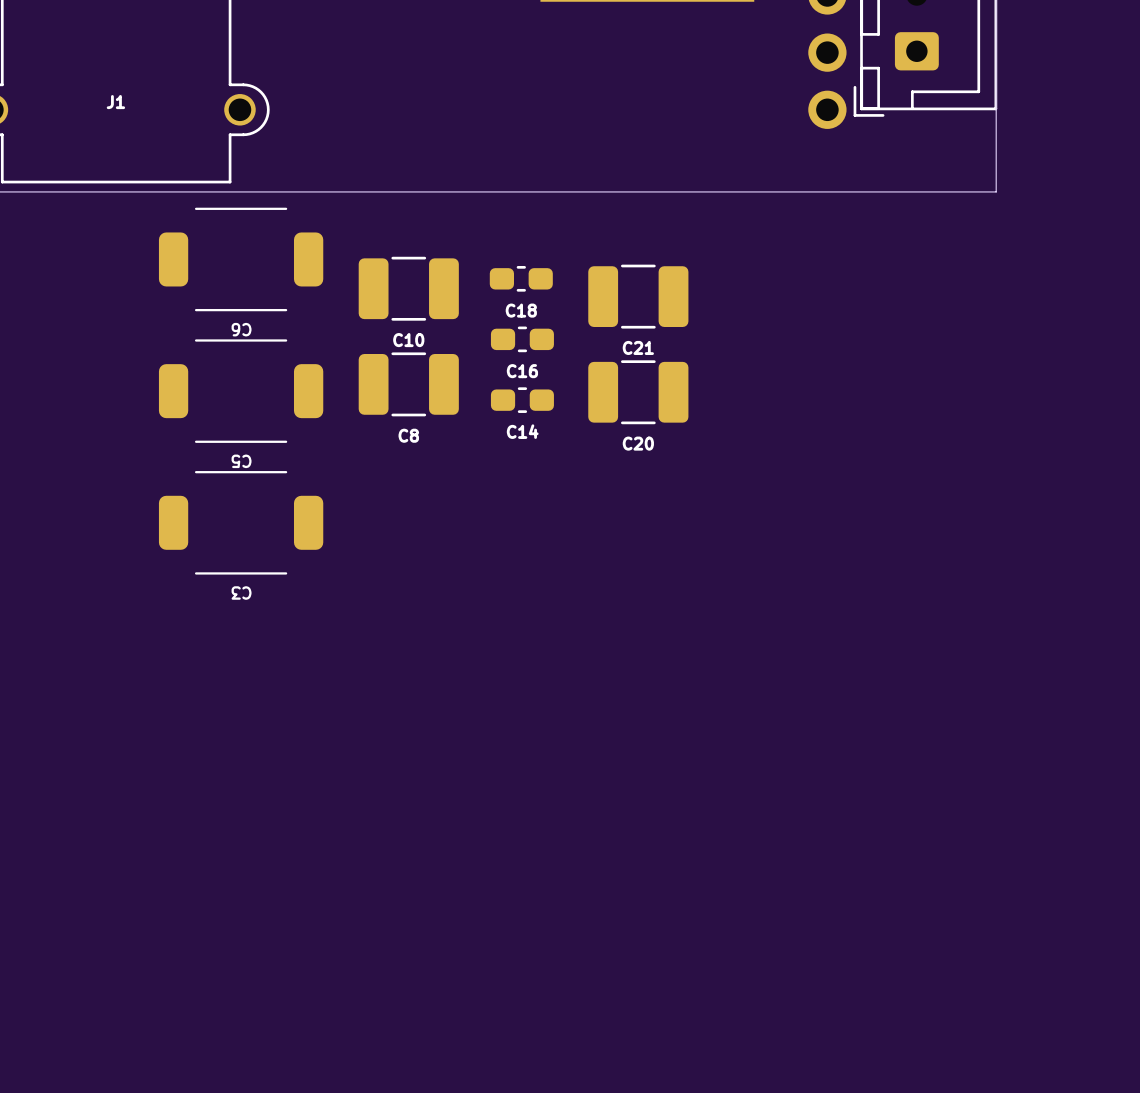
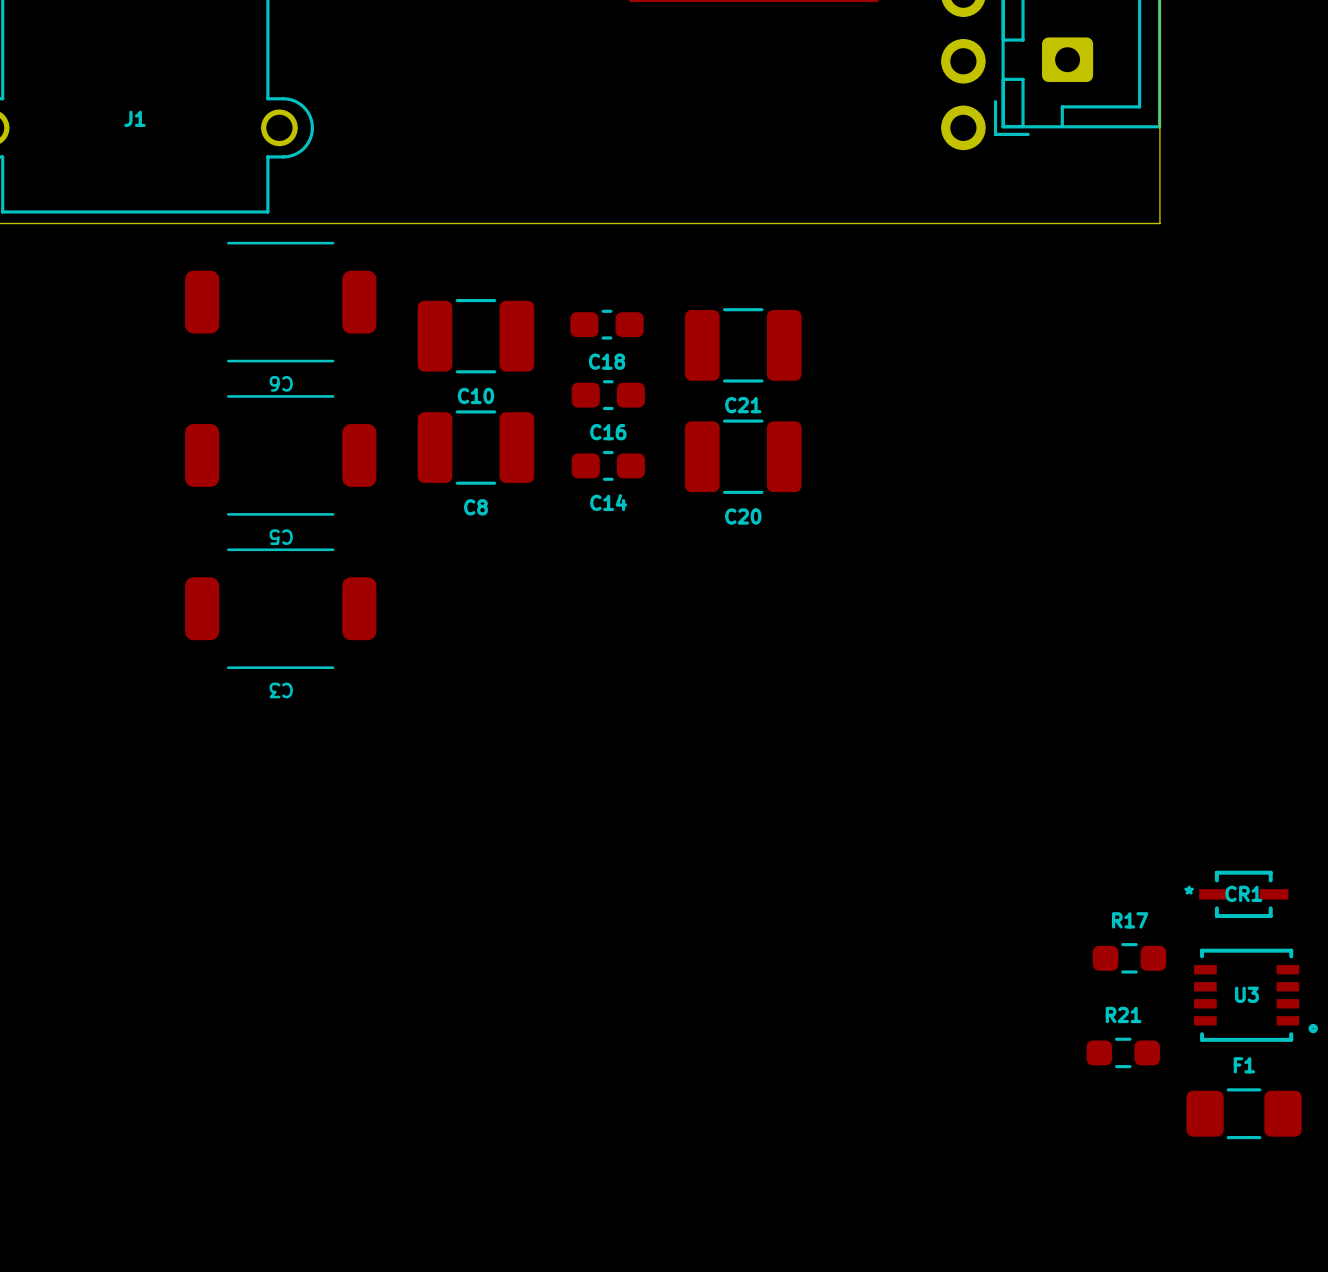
CR1: none -> (1243, 894)
R17: none -> (1129, 958)
U3: none -> (1255, 995)
R21: none -> (1123, 1052)
F1: none -> (1244, 1113)

